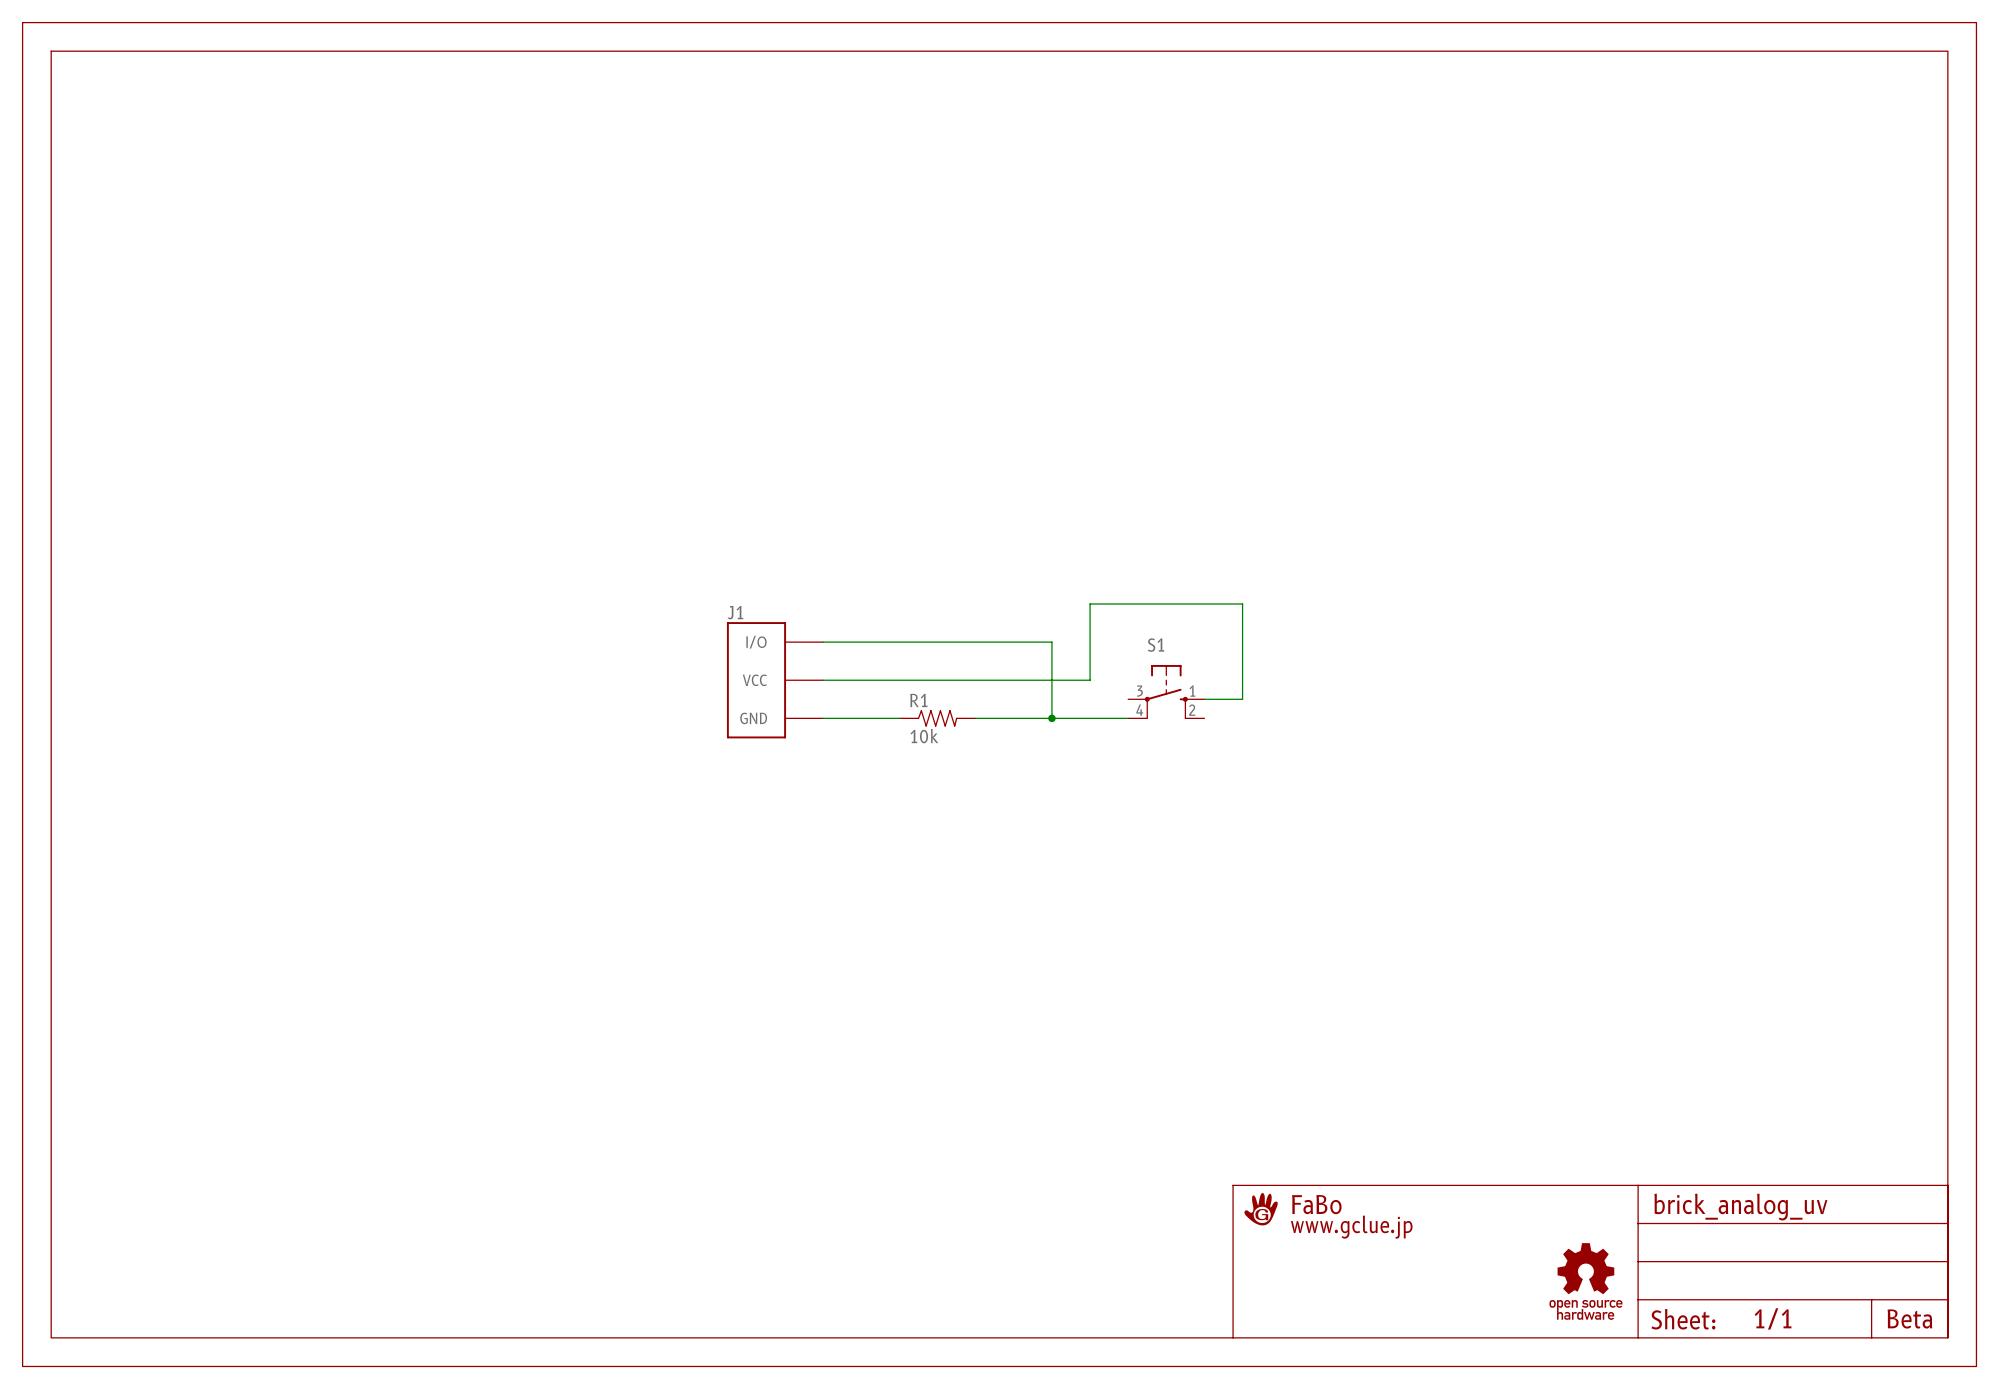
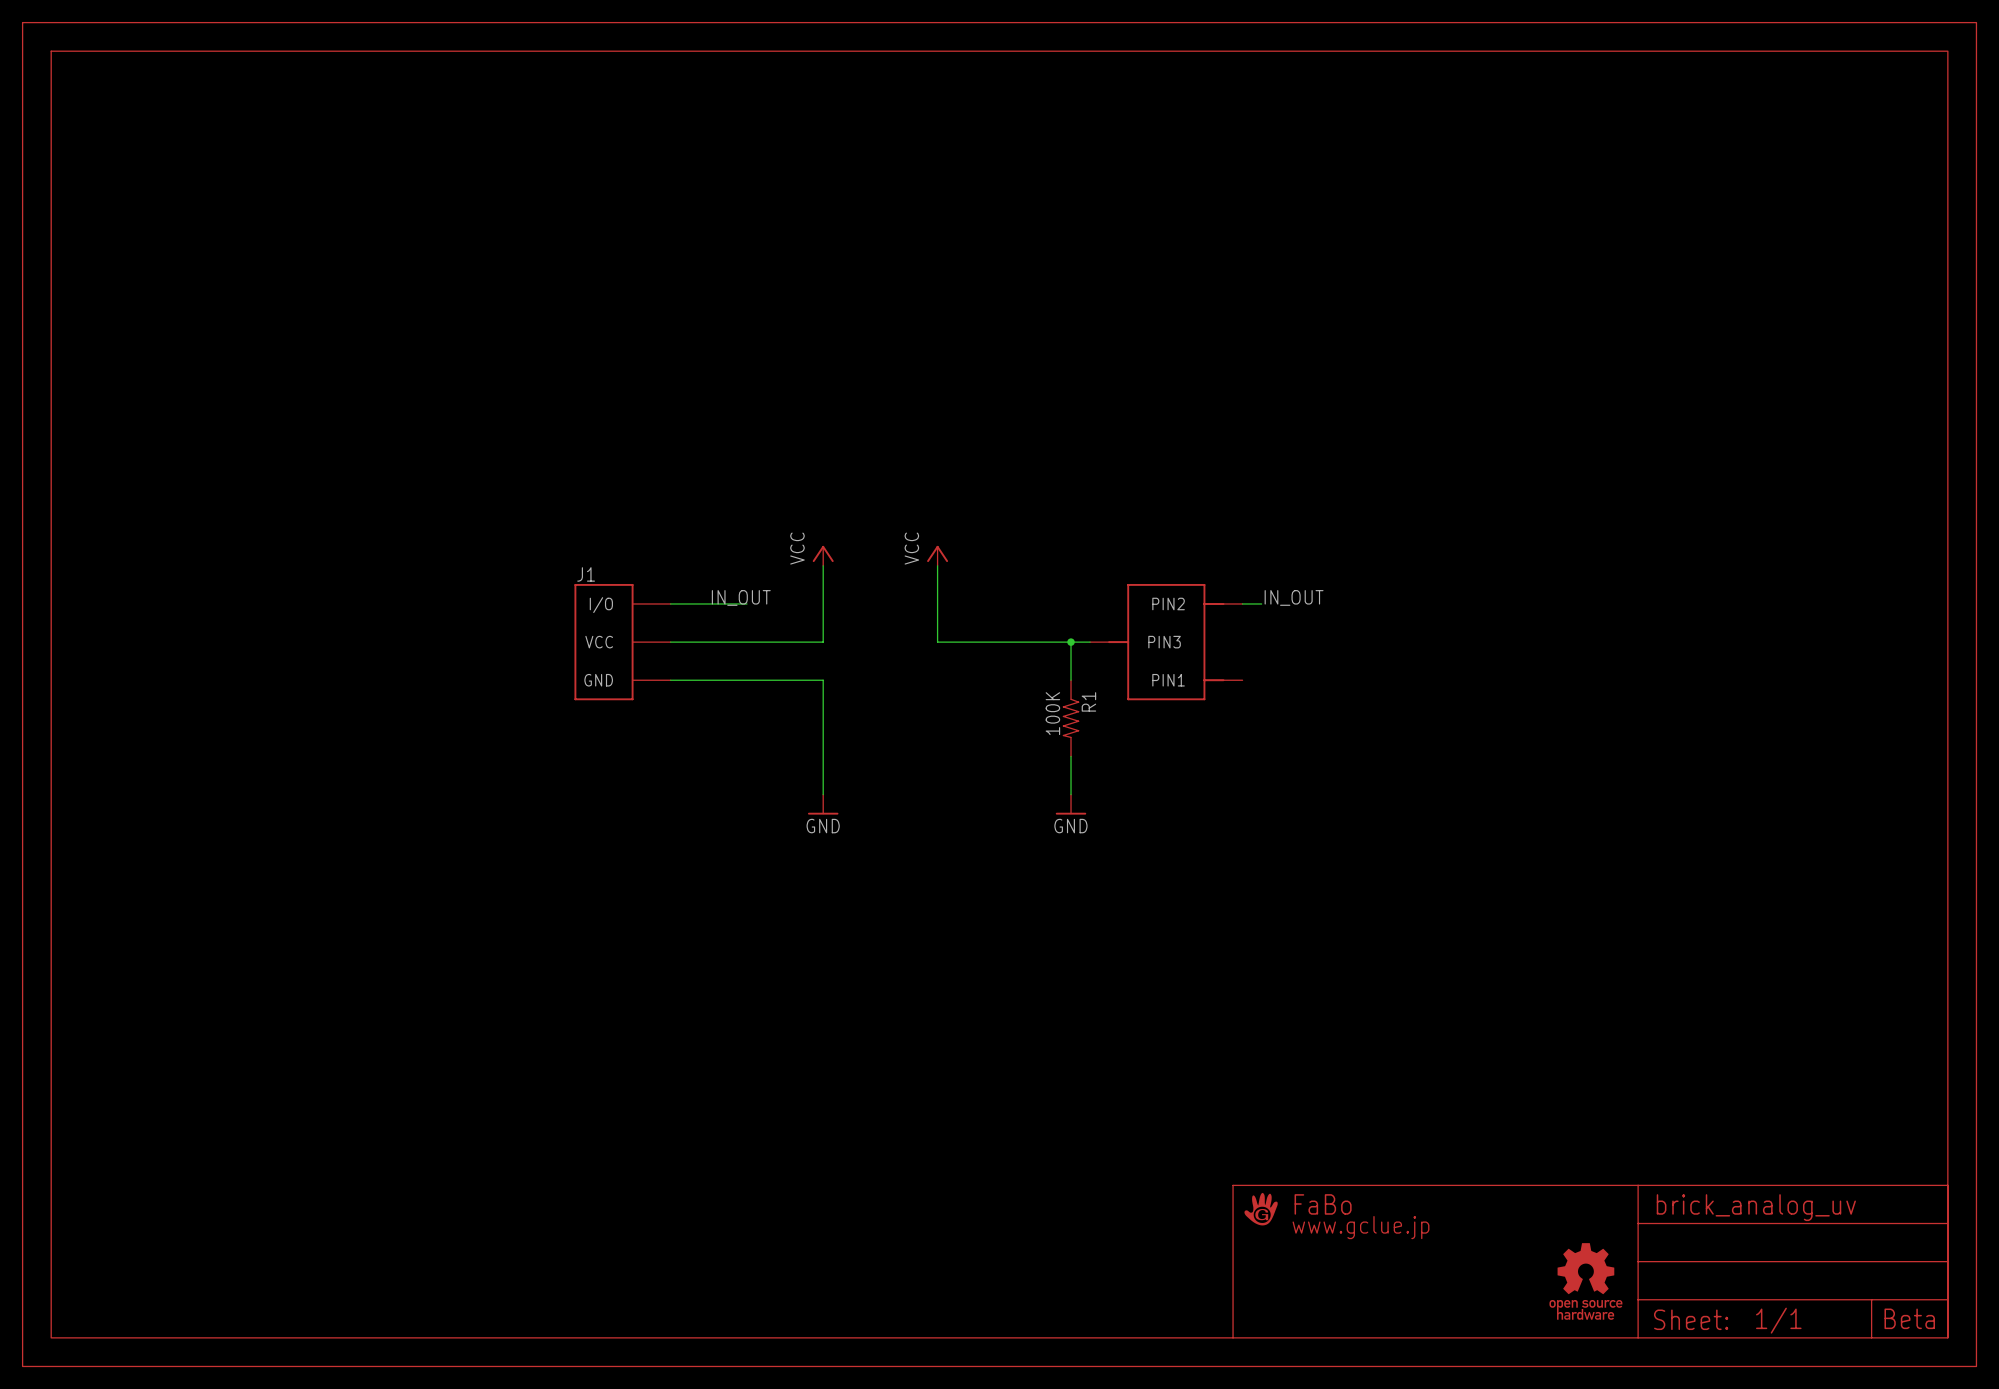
power symbol: none -> VCC (823, 555)
power symbol: none -> VCC (937, 555)
wire: none -> (823, 565) (823, 642) (670, 642)
label: none -> IN_OUT (741, 597)
label: none -> IN_OUT (1294, 597)
wire: none -> (670, 603) (746, 603)
wire: none -> (1242, 603) (1261, 603)
wire: (823, 642) (937, 642) -> (937, 565) (937, 642)
wire: (1051, 642) (1051, 718) -> (1051, 642) (1090, 642)
wire: none -> (1071, 642) (1071, 680)
junction: none -> (1071, 642)
part: none -> (1166, 642)
wire: none -> (670, 680) (823, 680) (823, 794)
J1 position: (775, 680) -> (622, 642)
wire: (823, 680) (1090, 680) (1090, 603) (1242, 603) (1242, 699) (1204, 699) -> none
S1: (1166, 691) -> none
wire: (823, 718) (899, 718) -> none
R1 rotation: 0° (937, 718) -> 90° clockwise (1071, 718)
R1 position: (937, 718) -> (1071, 718)
wire: (975, 718) (1128, 718) -> none
junction: (1051, 718) -> none
R1 value: 10k (924, 736) -> 100K (1052, 713)
wire: none -> (1071, 756) (1071, 794)
power symbol: none -> GND (823, 804)
power symbol: none -> GND (1071, 804)

